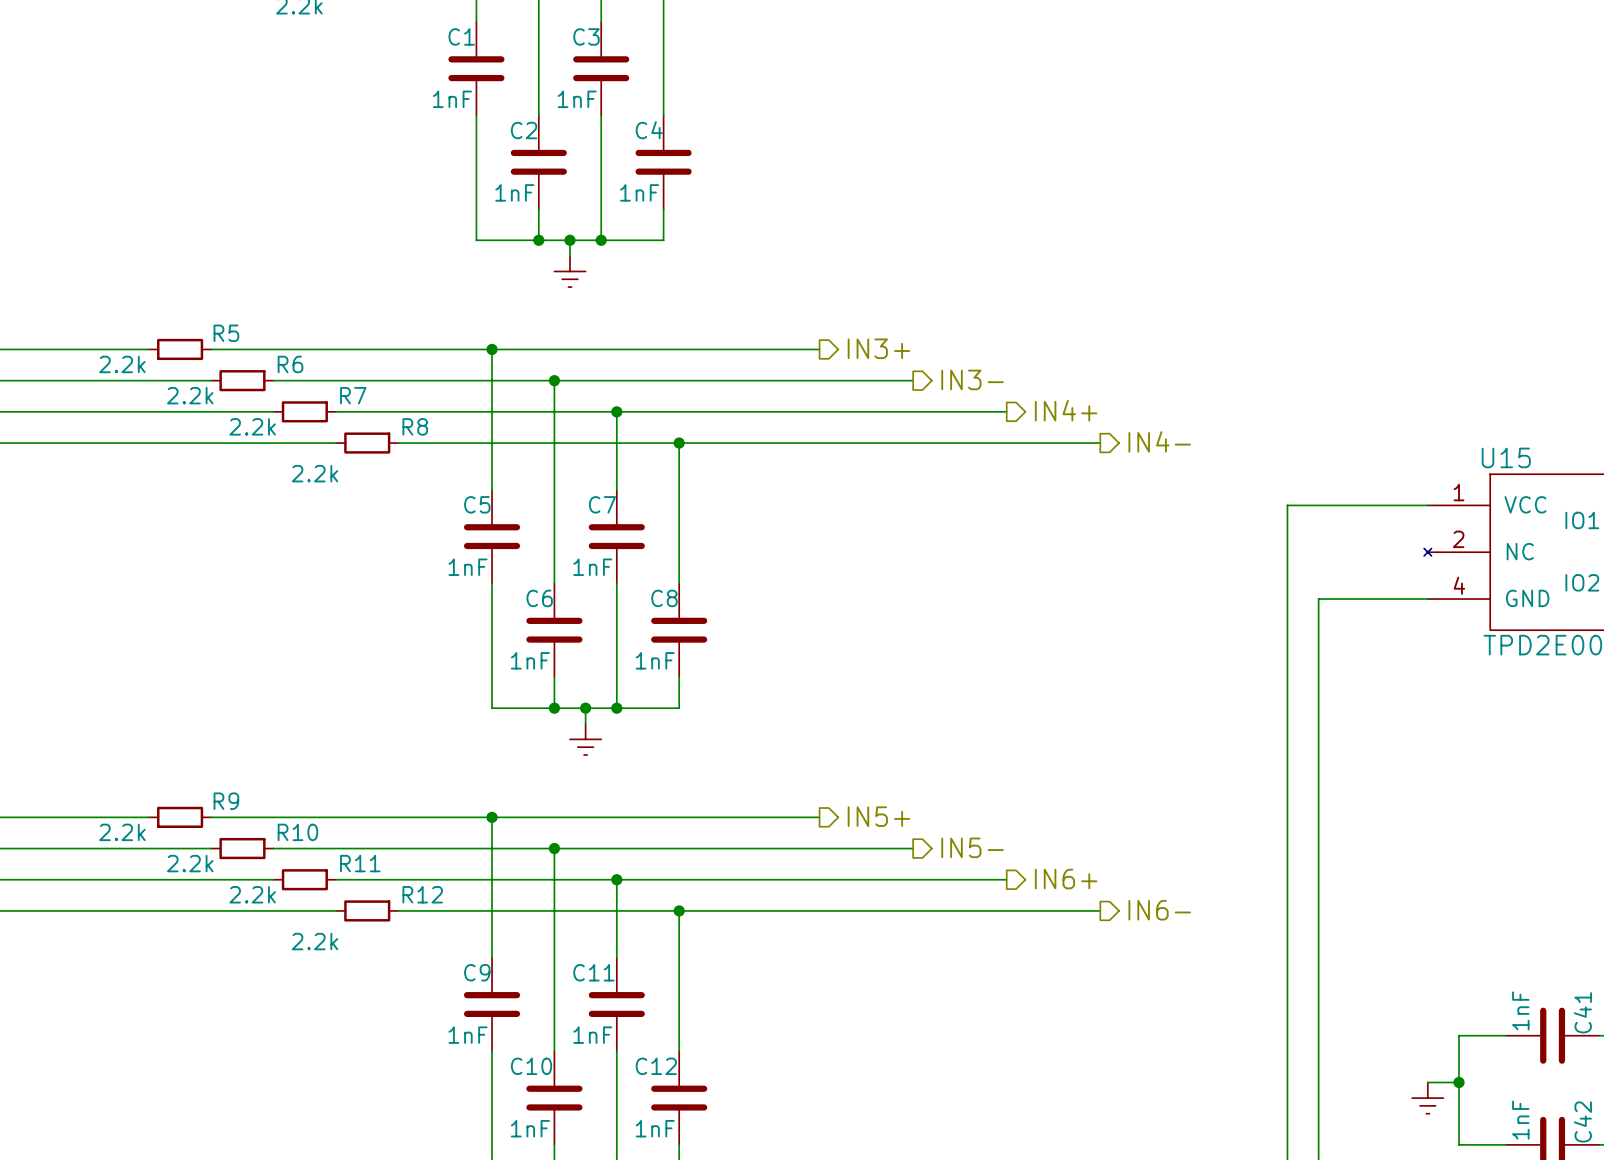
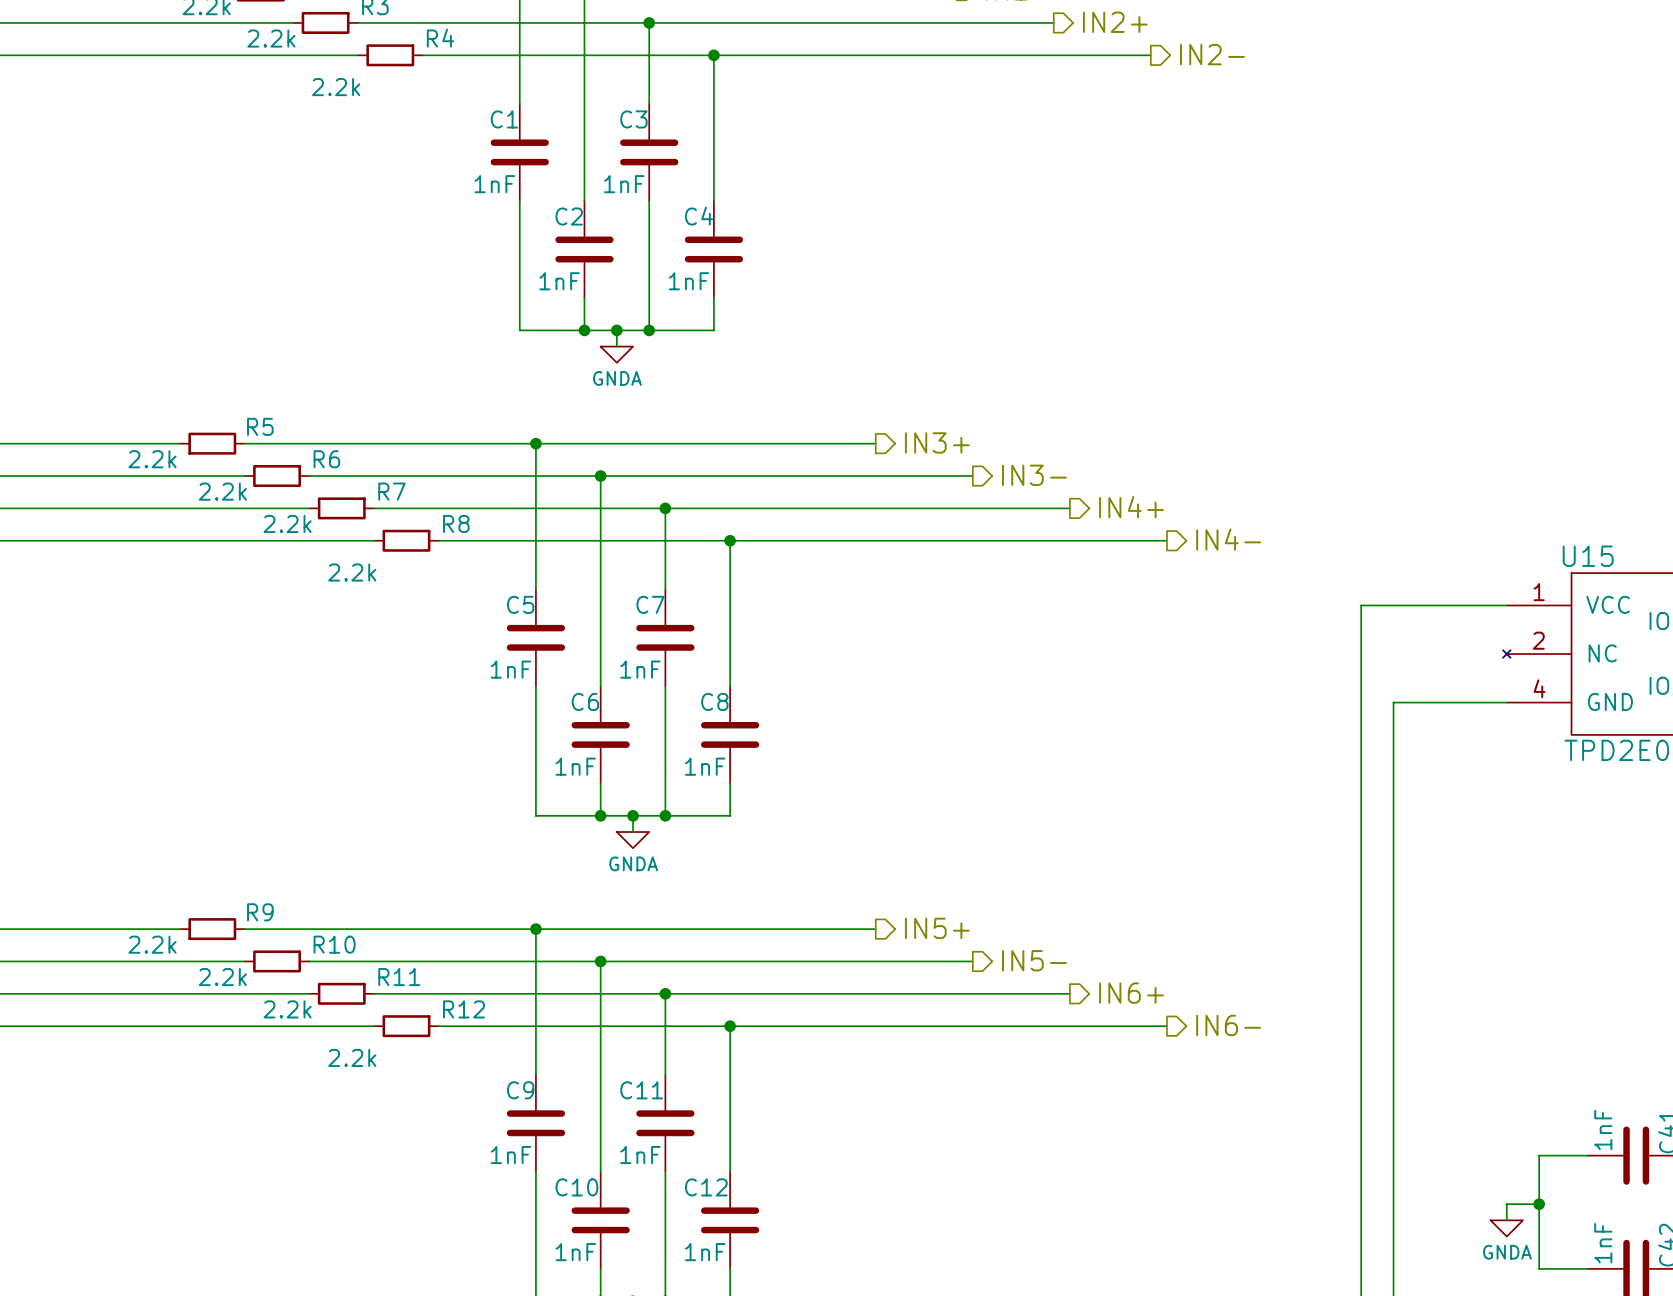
power symbol shape: [554, 255, 586, 288] -> [600, 346, 634, 363]
power symbol text: none -> GNDA (617, 378)
power symbol shape: [570, 723, 602, 755] -> [616, 832, 650, 849]
power symbol text: none -> GNDA (633, 863)
power symbol shape: [1412, 1082, 1444, 1114] -> [1490, 1220, 1523, 1237]
power symbol text: none -> GNDA (1507, 1252)

